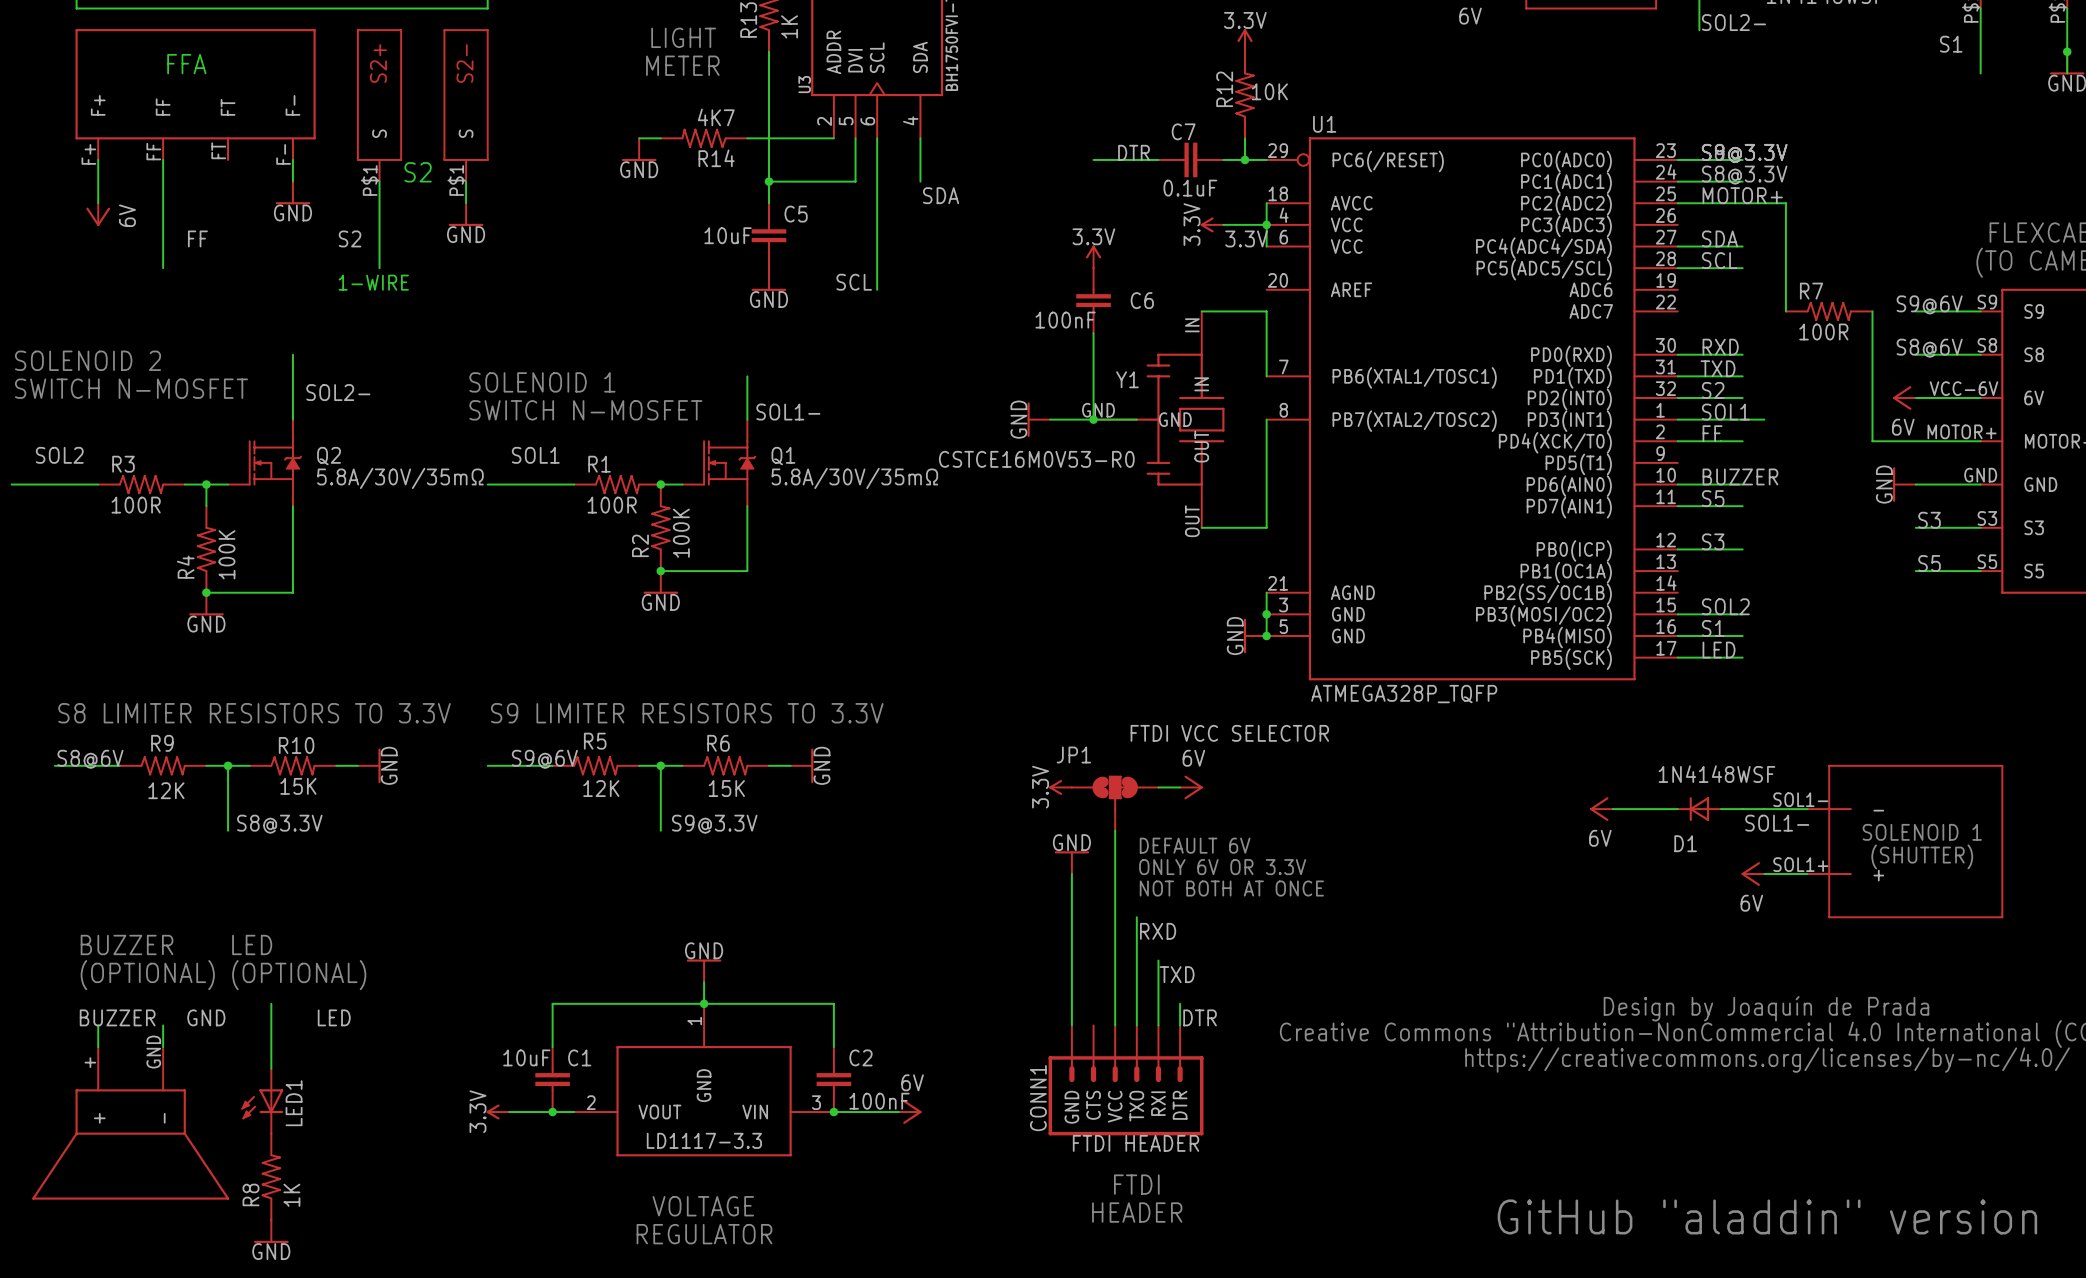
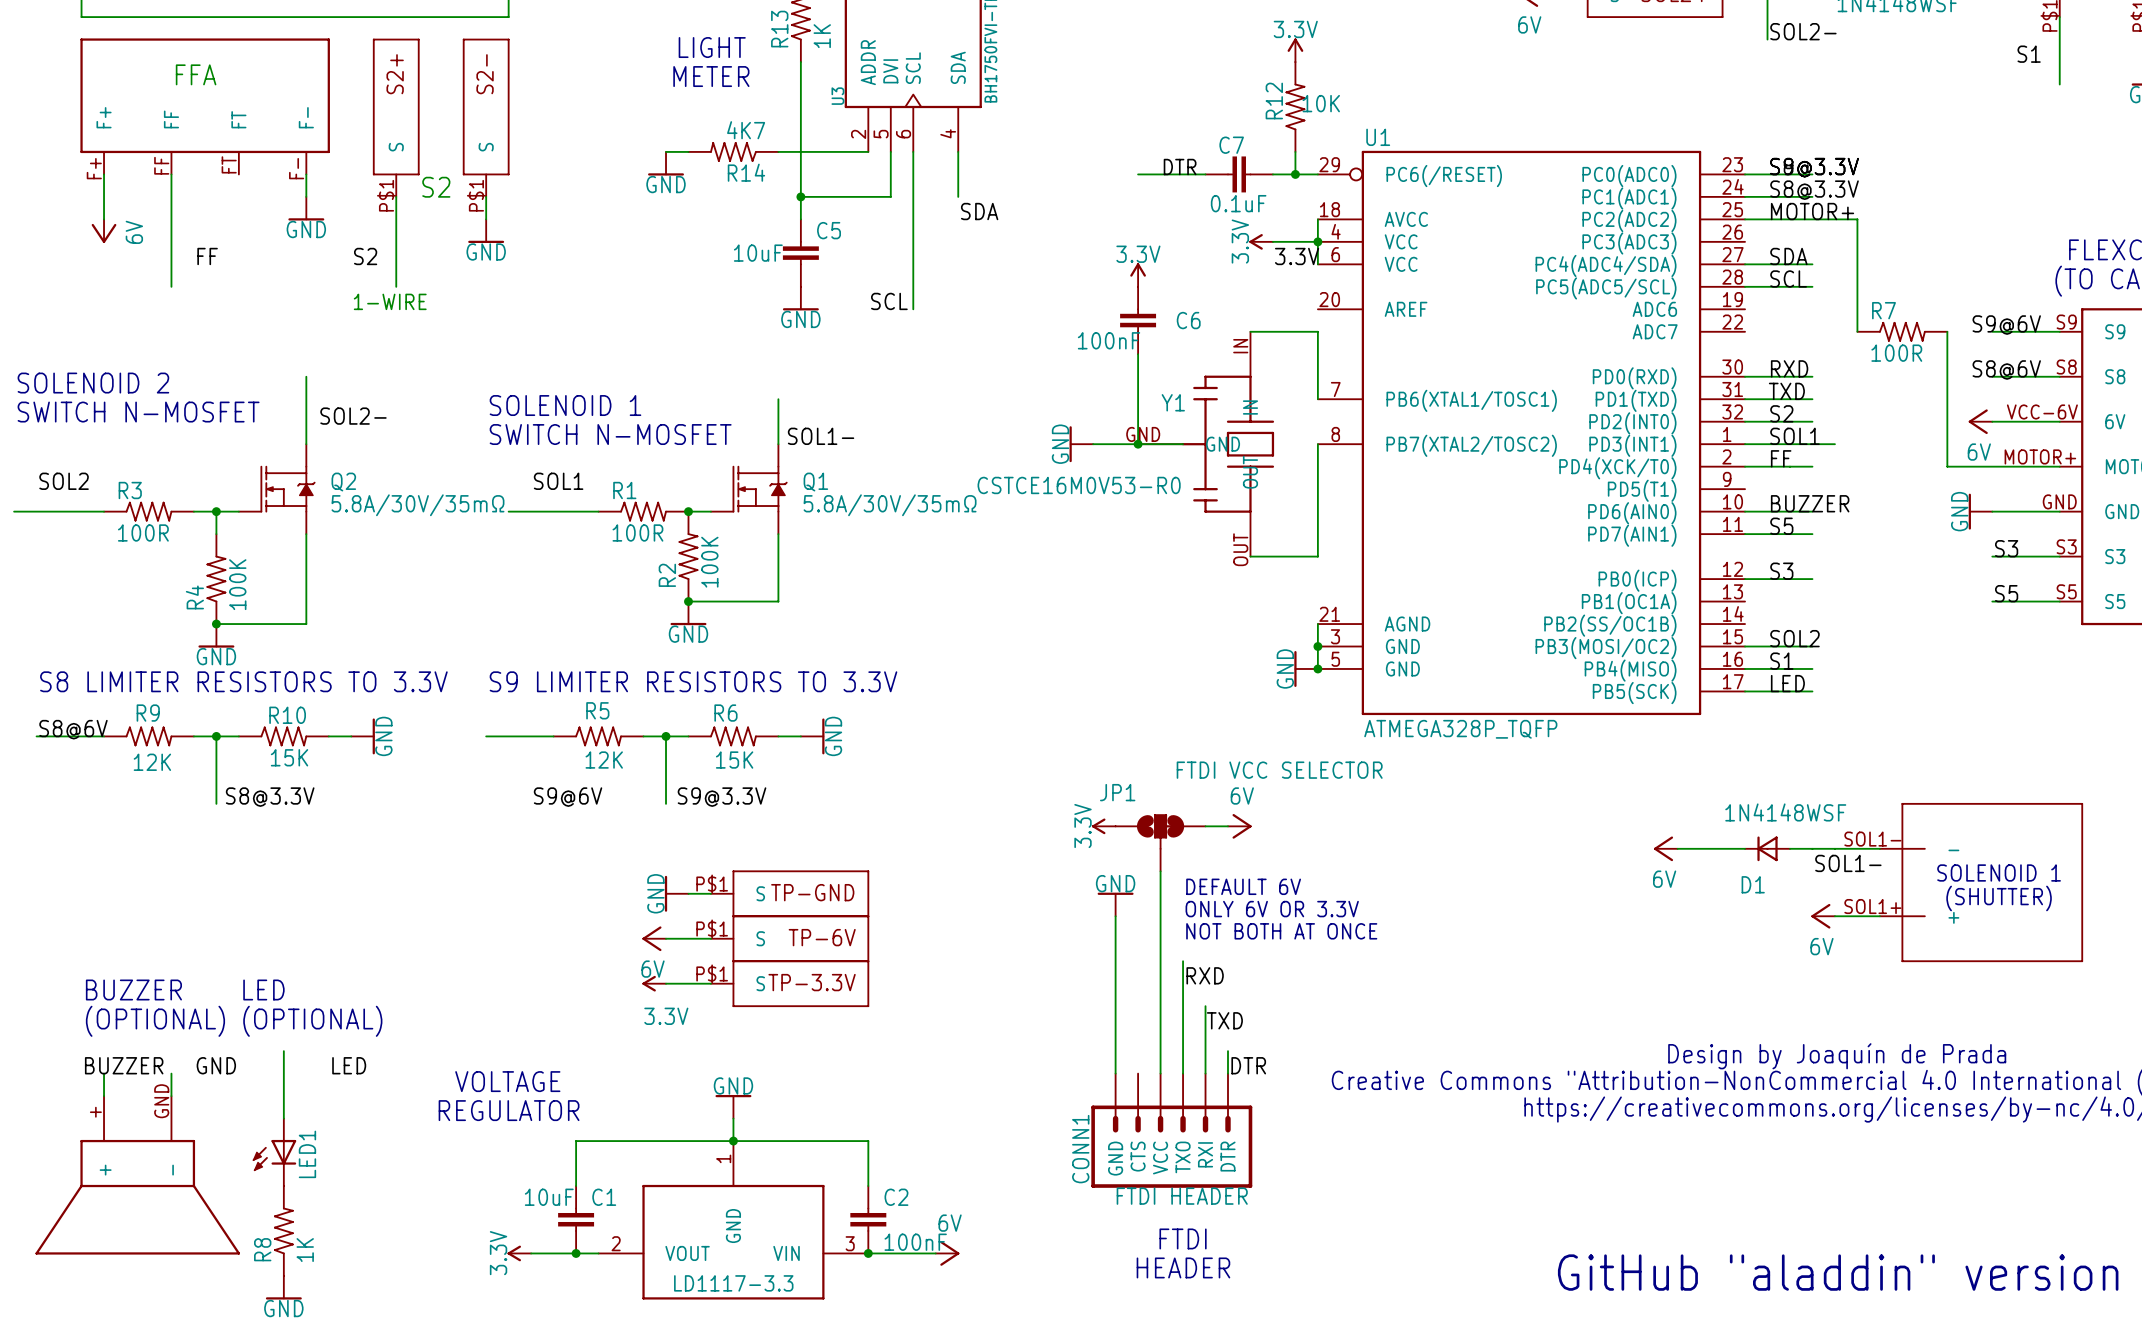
wire: none -> (193, 736) (238, 736)
junction: none -> (216, 736)
wire: none -> (643, 736) (688, 736)
junction: none -> (666, 736)
text position: S8 LIMITER RESISTORS TO 3.3V (254, 713) -> S8 LIMITER RESISTORS TO 3.3V (243, 681)
text position: S9 LIMITER RESISTORS TO 3.3V (687, 713) -> S9 LIMITER RESISTORS TO 3.3V (693, 681)
label position: S8@6V (90, 759) -> S8@6V (73, 729)
wire: (54, 765) (119, 765) -> (36, 736) (104, 736)
R9 position: (163, 765) -> (148, 736)
wire: (206, 765) (249, 765) -> (216, 803) (216, 736)
wire: (228, 765) (228, 830) -> none
junction: (228, 765) -> none
R10 position: (292, 765) -> (283, 736)
wire: (336, 765) (357, 765) -> (328, 736) (351, 736)
power symbol position: GND (369, 765) -> GND (363, 736)
wire: (487, 765) (552, 765) -> (486, 736) (553, 736)
R5 position: (595, 765) -> (598, 736)
wire: (639, 765) (682, 765) -> (666, 803) (666, 736)
wire: (660, 765) (660, 830) -> none
junction: (660, 765) -> none
R6 position: (725, 765) -> (733, 736)
wire: (768, 765) (790, 765) -> (778, 736) (800, 736)
power symbol position: GND (801, 765) -> GND (812, 736)
label position: S8@3.3V (279, 824) -> S8@3.3V (270, 797)
label position: S9@3.3V (714, 824) -> S9@3.3V (722, 797)
power symbol: none -> GND (676, 893)
wire: none -> (688, 893) (710, 893)
TP-GND: none -> (789, 893)
power symbol: none -> 6V (654, 938)
wire: none -> (666, 938) (710, 938)
TP-6V: none -> (789, 938)
power symbol: none -> 3.3V (654, 983)
wire: none -> (666, 983) (710, 983)
TP-3.3V: none -> (789, 983)
power symbol: GND (704, 970) -> none
wire: (704, 982) (704, 1003) -> (733, 1118) (733, 1141)
junction: (704, 1003) -> none
text: none -> VOLTAGE (507, 1081)
wire: (552, 1047) (552, 1003) (833, 1003) (833, 1047) -> (576, 1186) (576, 1141) (868, 1141) (868, 1186)
power symbol: none -> GND (733, 1106)
text: none -> REGULATOR (509, 1110)
C1 position: (552, 1079) -> (576, 1219)
C2 position: (833, 1079) -> (868, 1219)
part position: (704, 1080) -> (733, 1220)
junction: none -> (733, 1141)
power symbol position: 3.3V (497, 1112) -> 3.3V (519, 1253)
wire: (509, 1112) (574, 1112) -> (531, 1253) (598, 1253)
junction: (552, 1112) -> none
wire: (833, 1112) (898, 1112) -> (868, 1253) (935, 1253)
junction: (833, 1112) -> none
power symbol position: 6V (910, 1112) -> 6V (947, 1253)
junction: none -> (576, 1253)
junction: none -> (868, 1253)
text: VOLTAGE (703, 1206) -> none
text: REGULATOR (704, 1234) -> none

